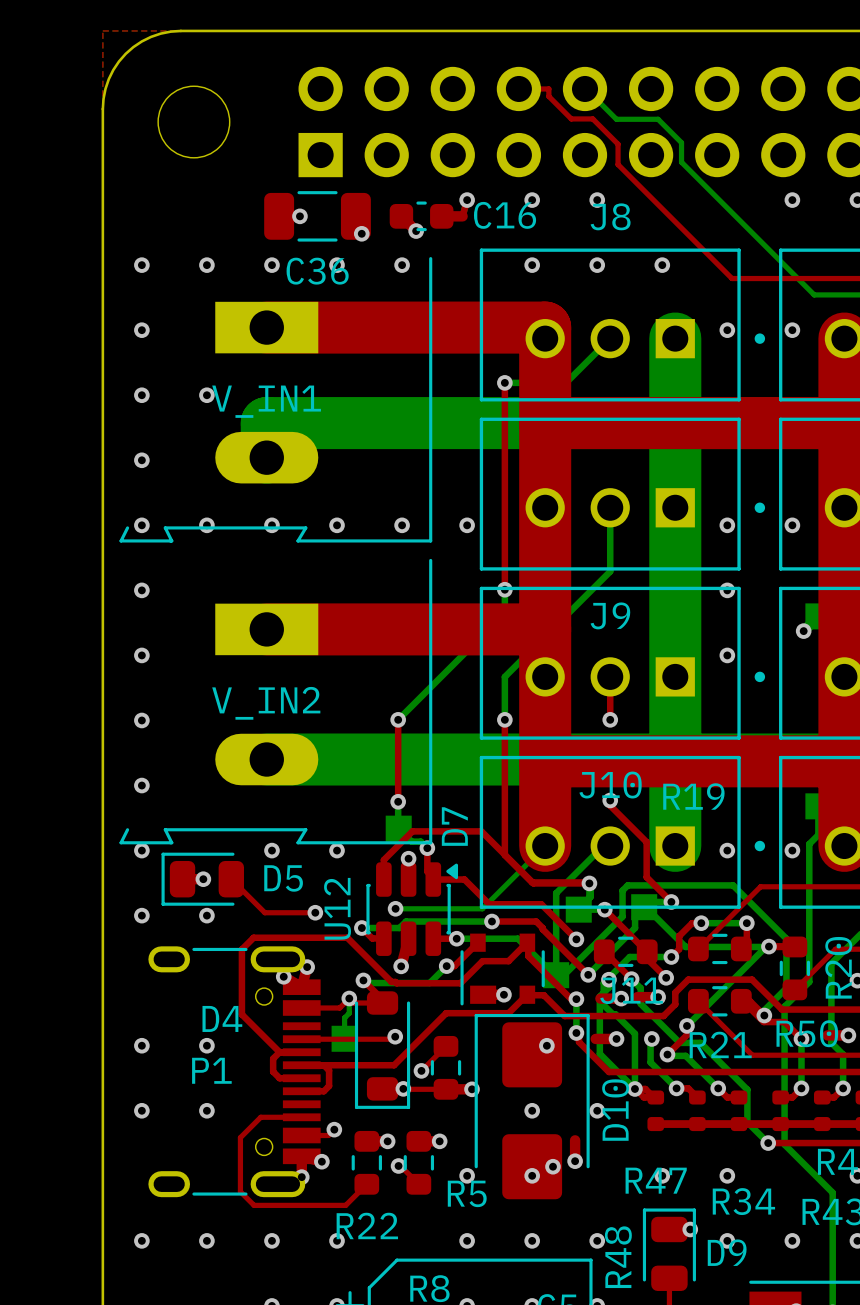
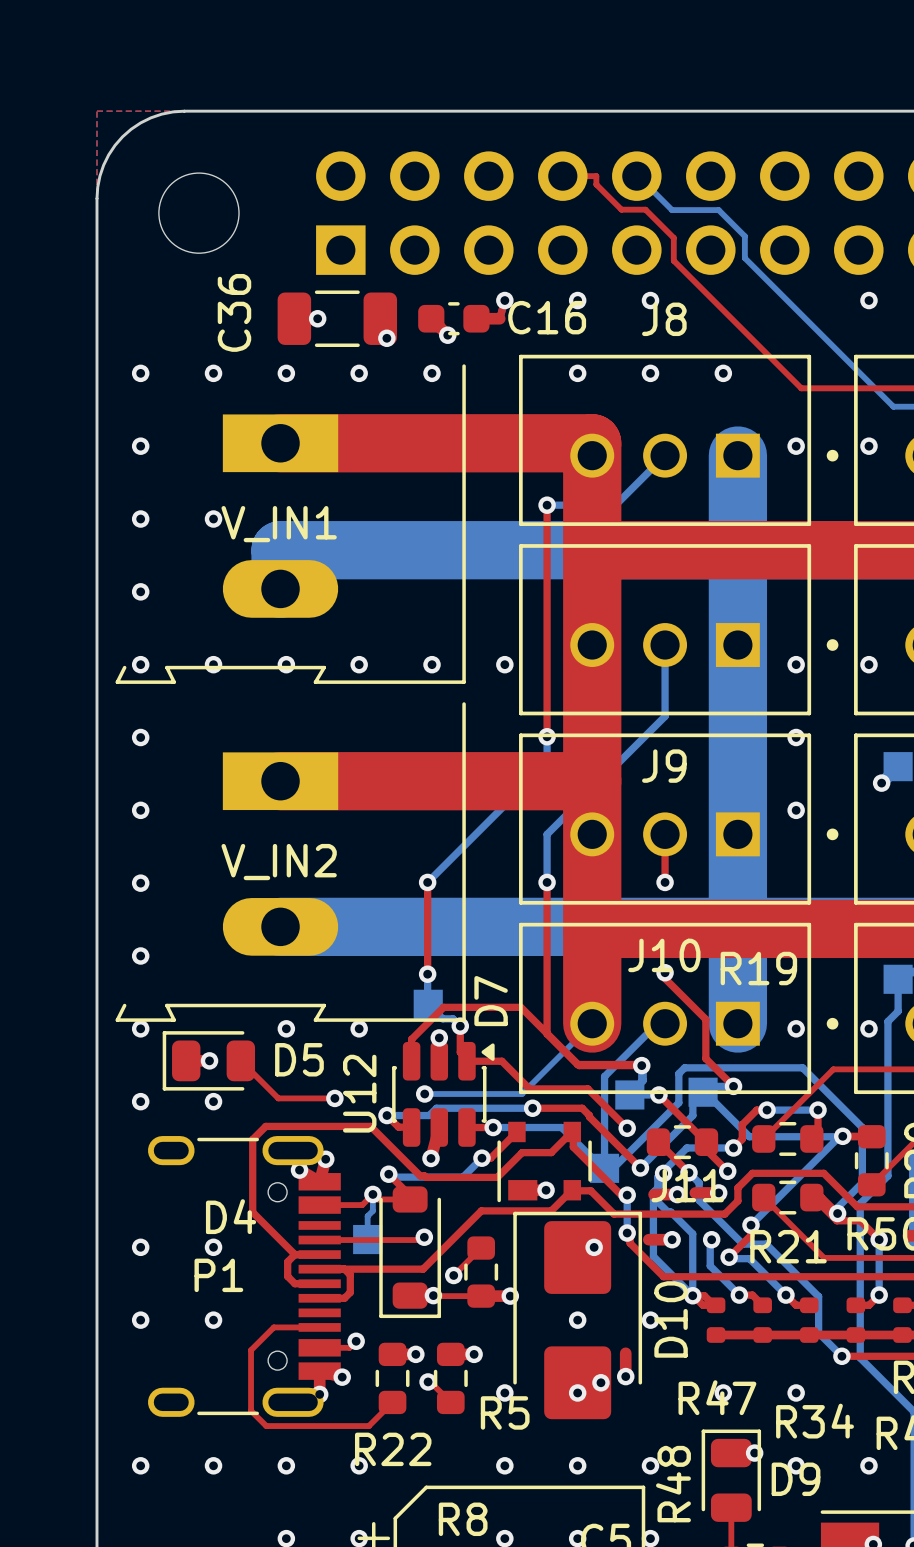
C36 name rotation: 0° (317, 271) -> 90° counterclockwise (234, 312)
C36 name position: C36 (317, 271) -> C36 (234, 312)

